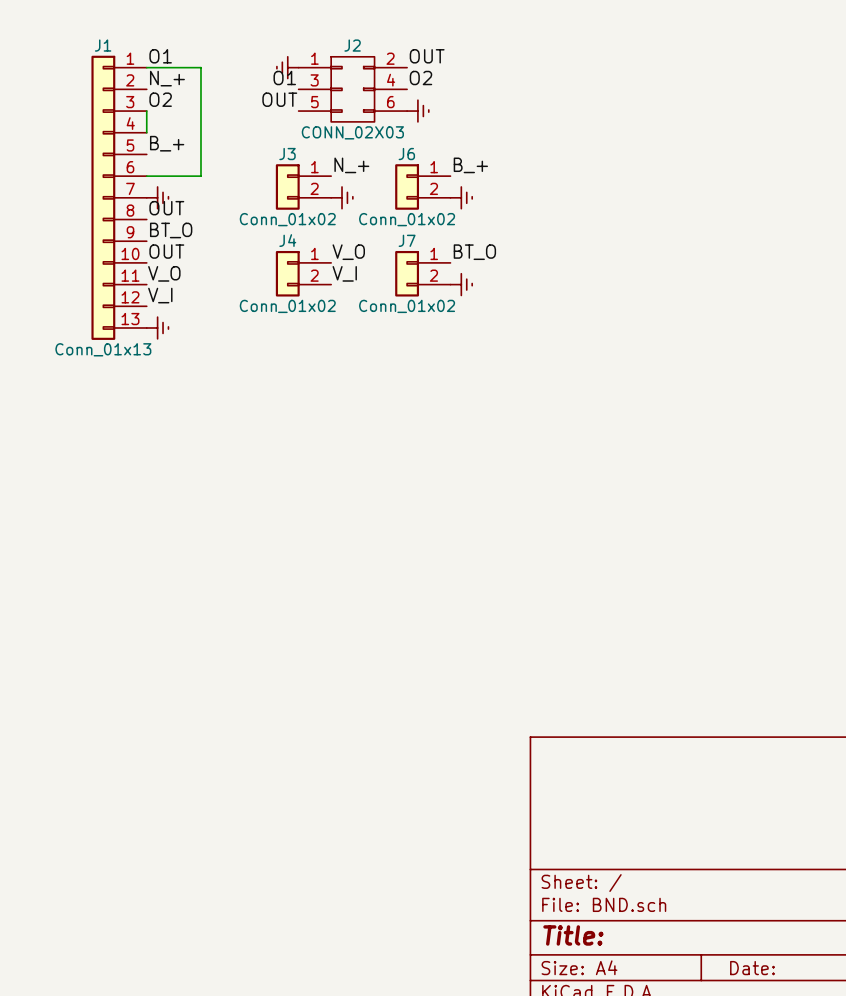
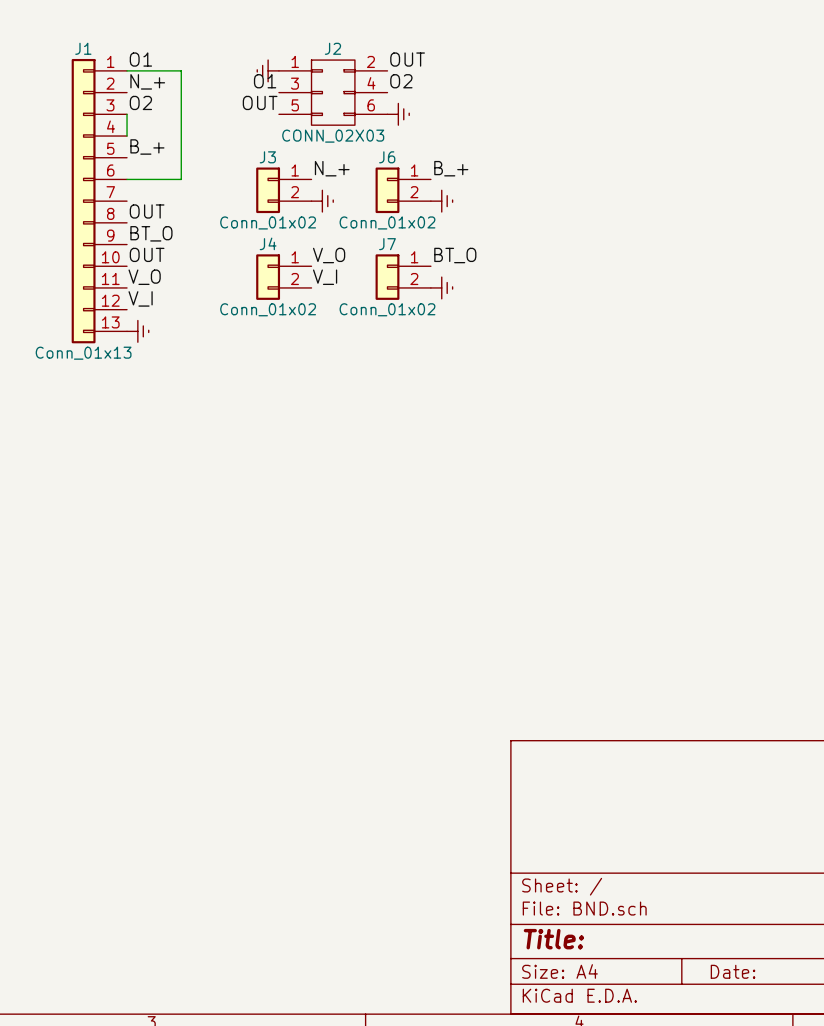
power symbol: (157, 197) -> none

